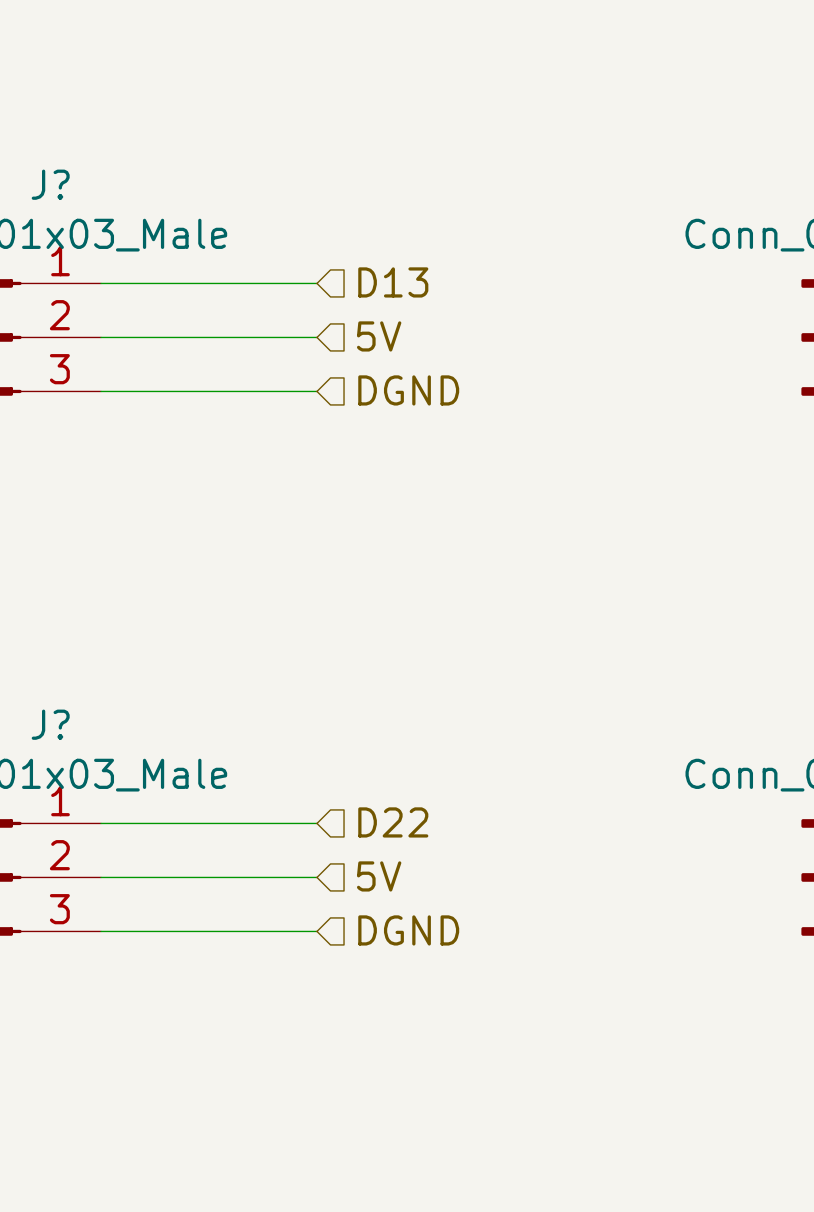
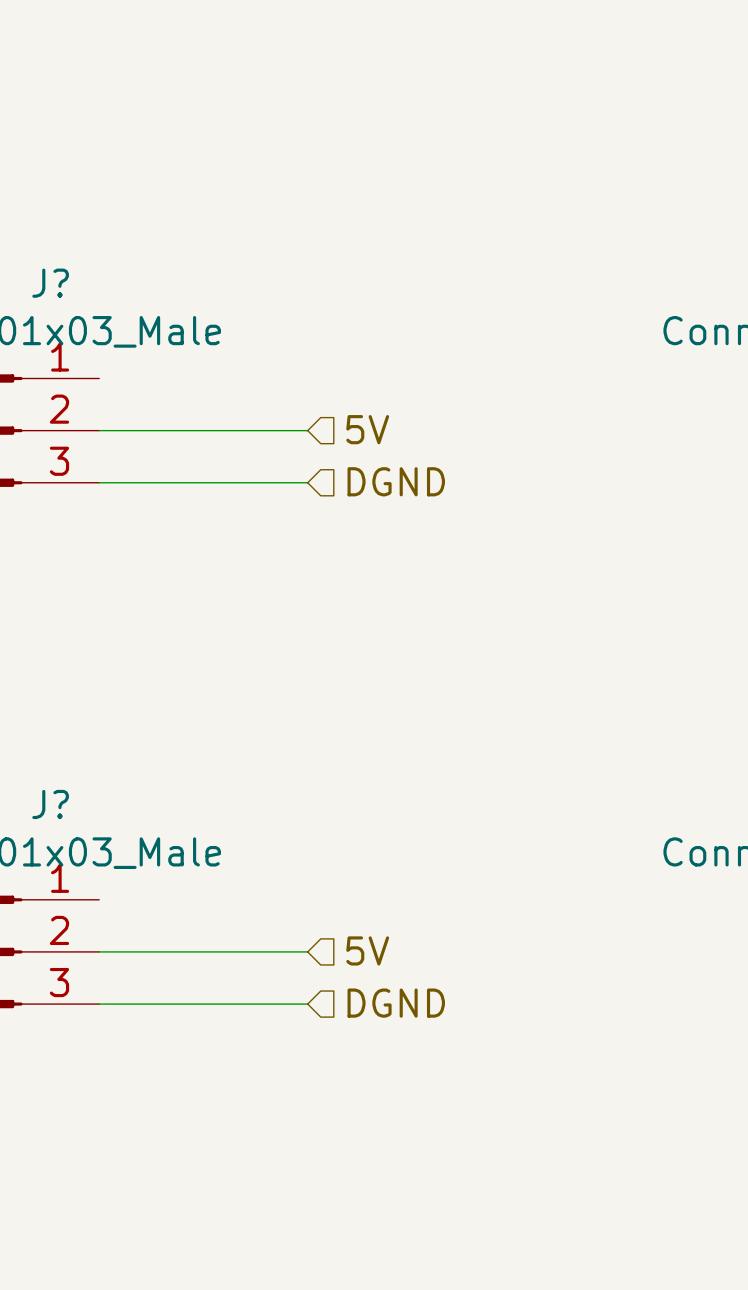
hierarchical label: D13 (393, 282) -> none
wire: (101, 283) (317, 283) -> none
hierarchical label: D22 (393, 822) -> none
wire: (101, 823) (317, 823) -> none

